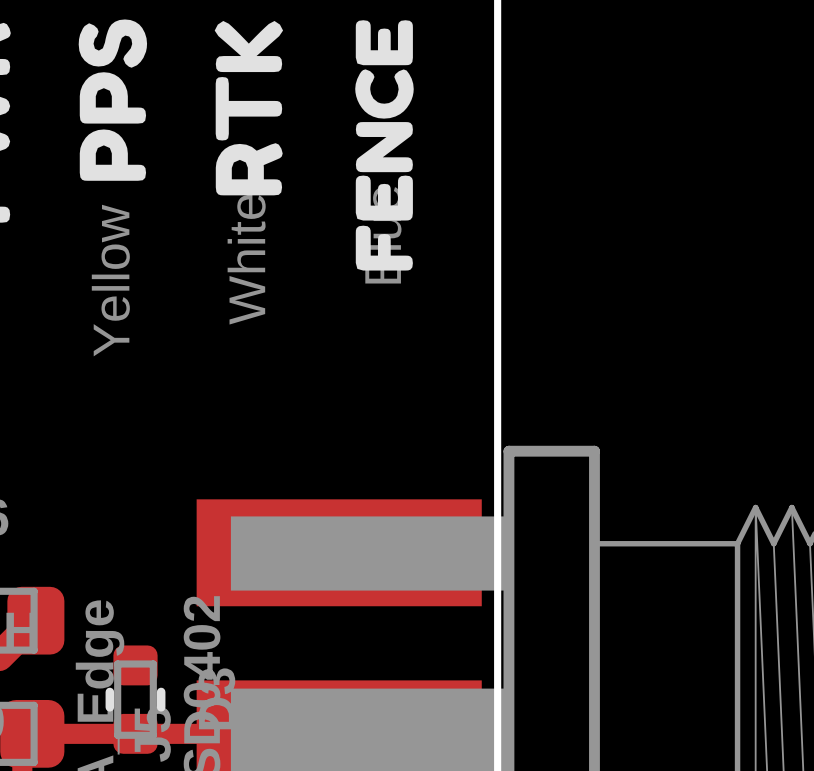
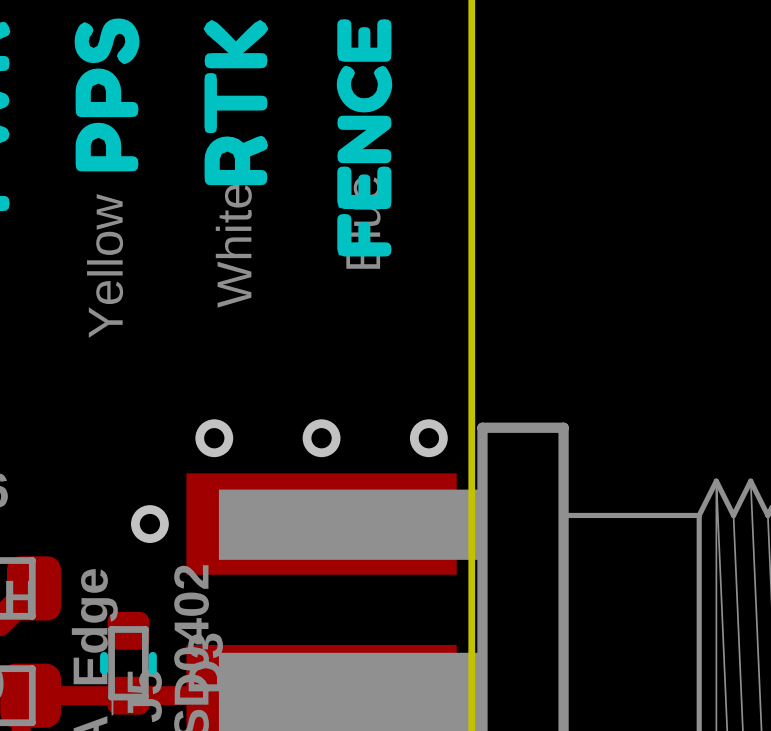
via: none -> (214, 438)
via: none -> (321, 438)
via: none -> (428, 438)
via: none -> (149, 524)

